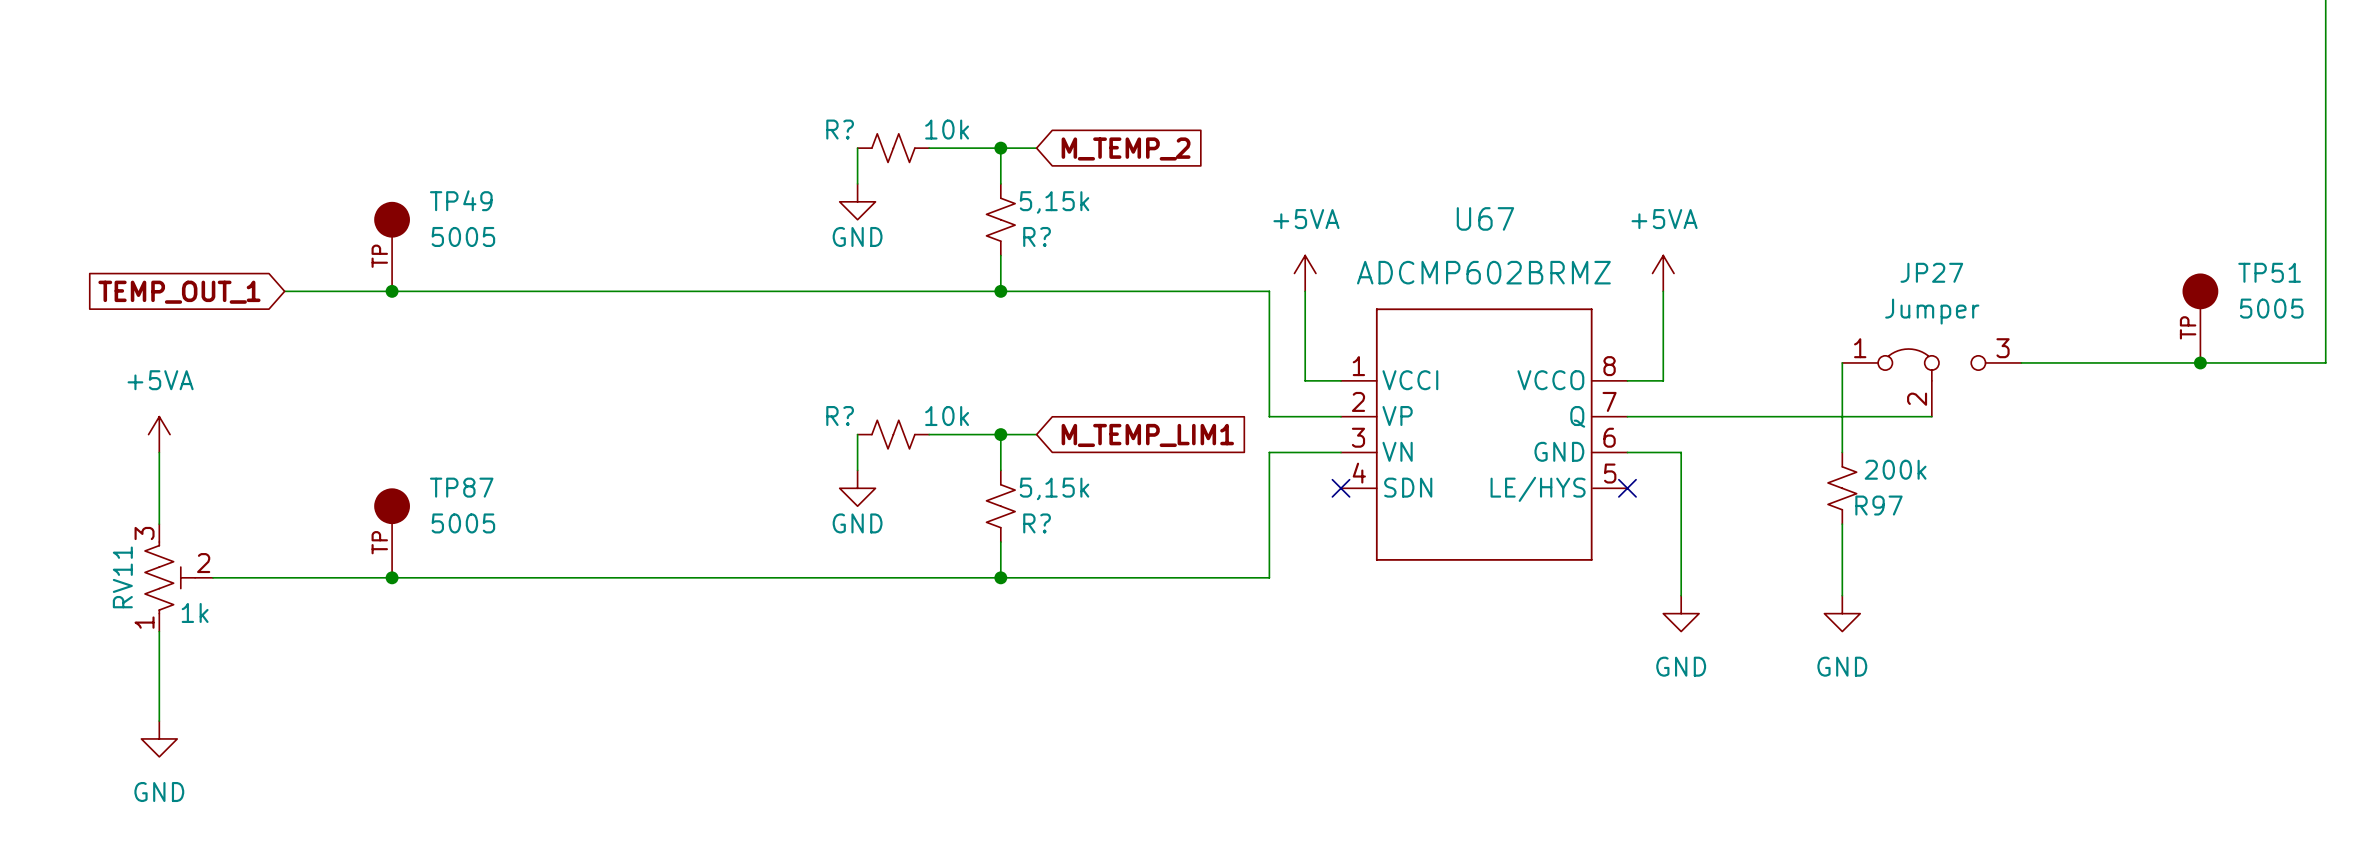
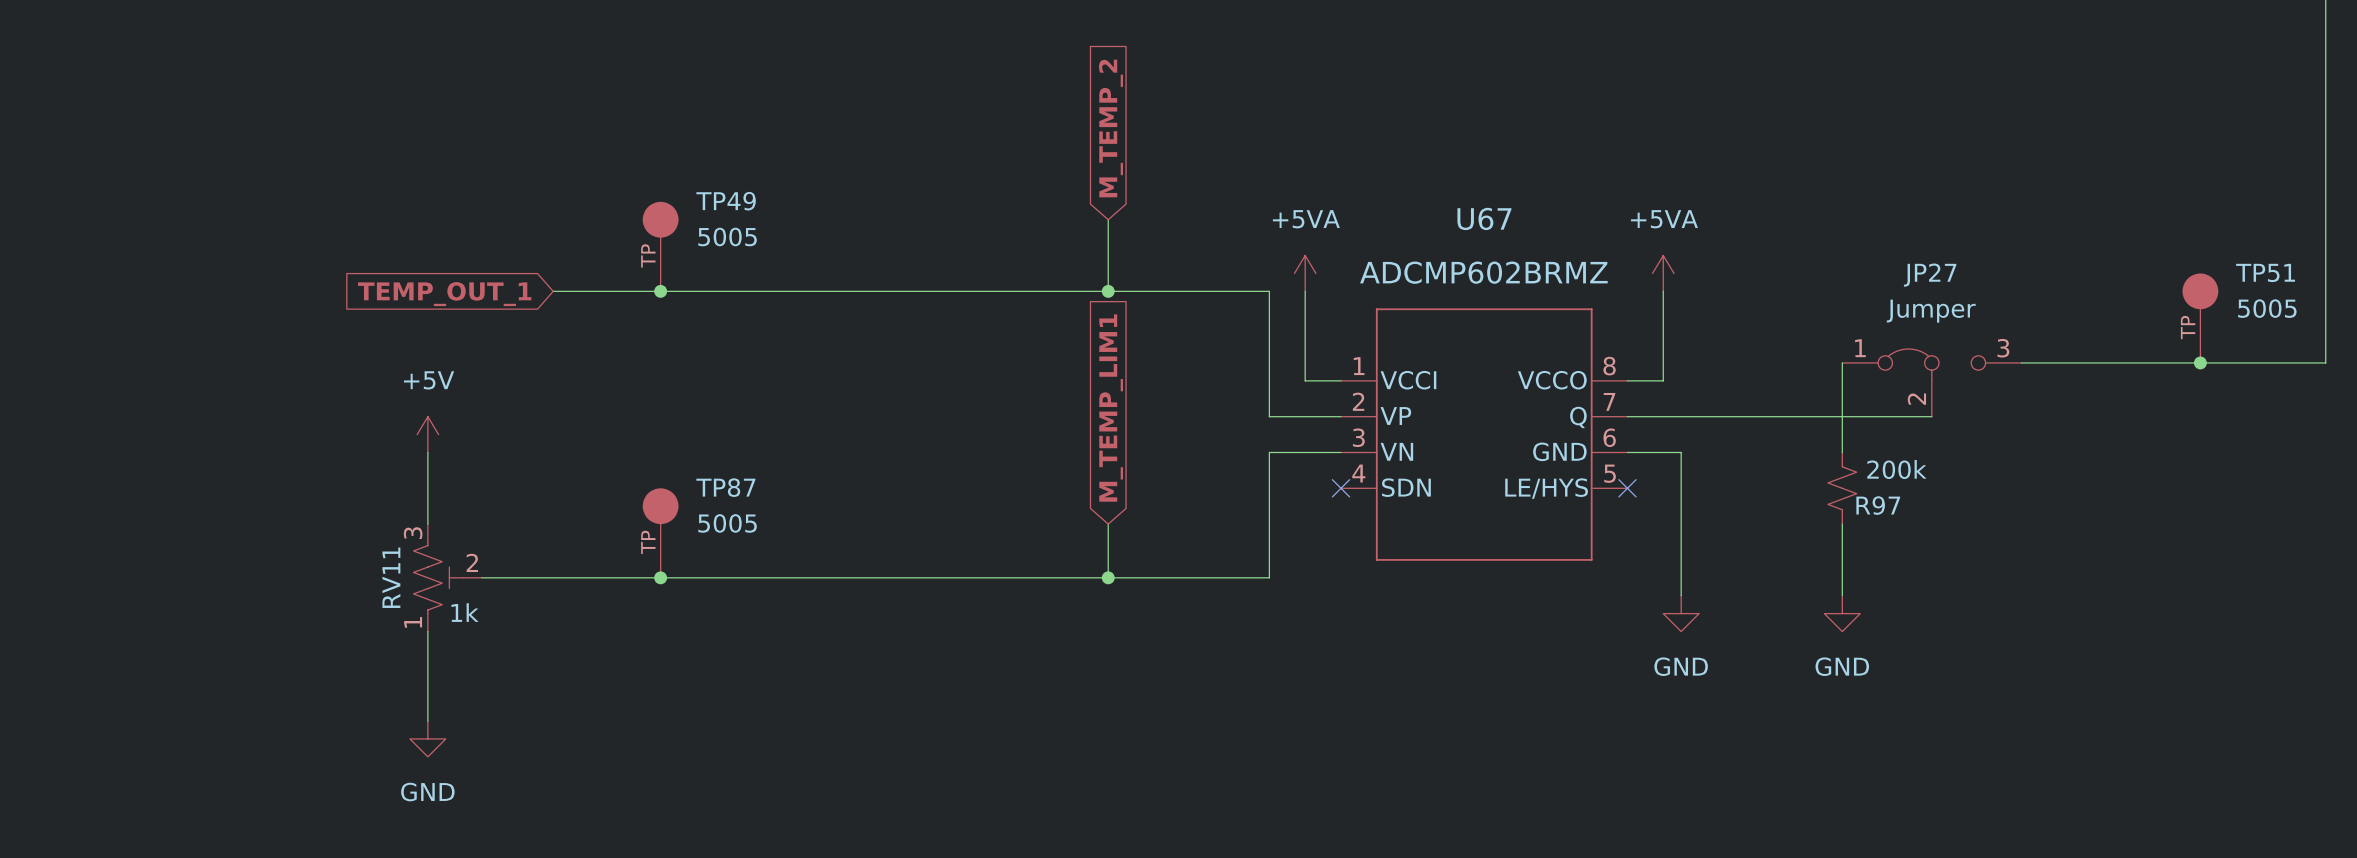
wire: (857, 148) (857, 183) -> none
R?: 10k (893, 148) -> none
wire: (929, 148) (1036, 148) -> none
wire: (1000, 148) (1000, 183) -> none
junction: (1000, 148) -> none
global label rotation: 0° (1126, 148) -> 90° counterclockwise (1110, 128)
power symbol: GND (857, 201) -> none
R?: 5,15k (1000, 219) -> none
wire: none -> (1108, 219) (1108, 291)
TP49 position: (392, 246) -> (660, 246)
wire: (1000, 255) (1000, 291) -> none
wire: (284, 291) (553, 291) -> none
junction: (392, 291) -> none
junction: none -> (660, 291)
junction: (1000, 291) -> none
junction: none -> (1108, 291)
global label position: TEMP_OUT_1 (179, 292) -> TEMP_OUT_1 (444, 294)
power symbol: +5VA (159, 434) -> none
power symbol: none -> +5V (427, 434)
wire: (857, 434) (857, 470) -> none
R?: 10k (893, 434) -> none
wire: (929, 434) (1036, 434) -> none
wire: (1000, 434) (1000, 470) -> none
junction: (1000, 434) -> none
global label rotation: 0° (1147, 435) -> 90° counterclockwise (1111, 408)
wire: (159, 452) (159, 524) -> (427, 452) (427, 524)
power symbol: GND (857, 488) -> none
R?: 5,15k (1000, 506) -> none
wire: none -> (1108, 524) (1108, 577)
TP87 position: (392, 533) -> (660, 533)
wire: (1000, 542) (1000, 577) -> none
RV11 position: (179, 577) -> (447, 577)
wire: (213, 577) (481, 577) -> none
junction: (392, 577) -> none
junction: none -> (660, 577)
junction: (1000, 577) -> none
junction: none -> (1108, 577)
wire: (159, 631) (159, 721) -> (427, 631) (427, 721)
power symbol: GND (159, 738) -> none
power symbol: none -> GND (427, 738)

